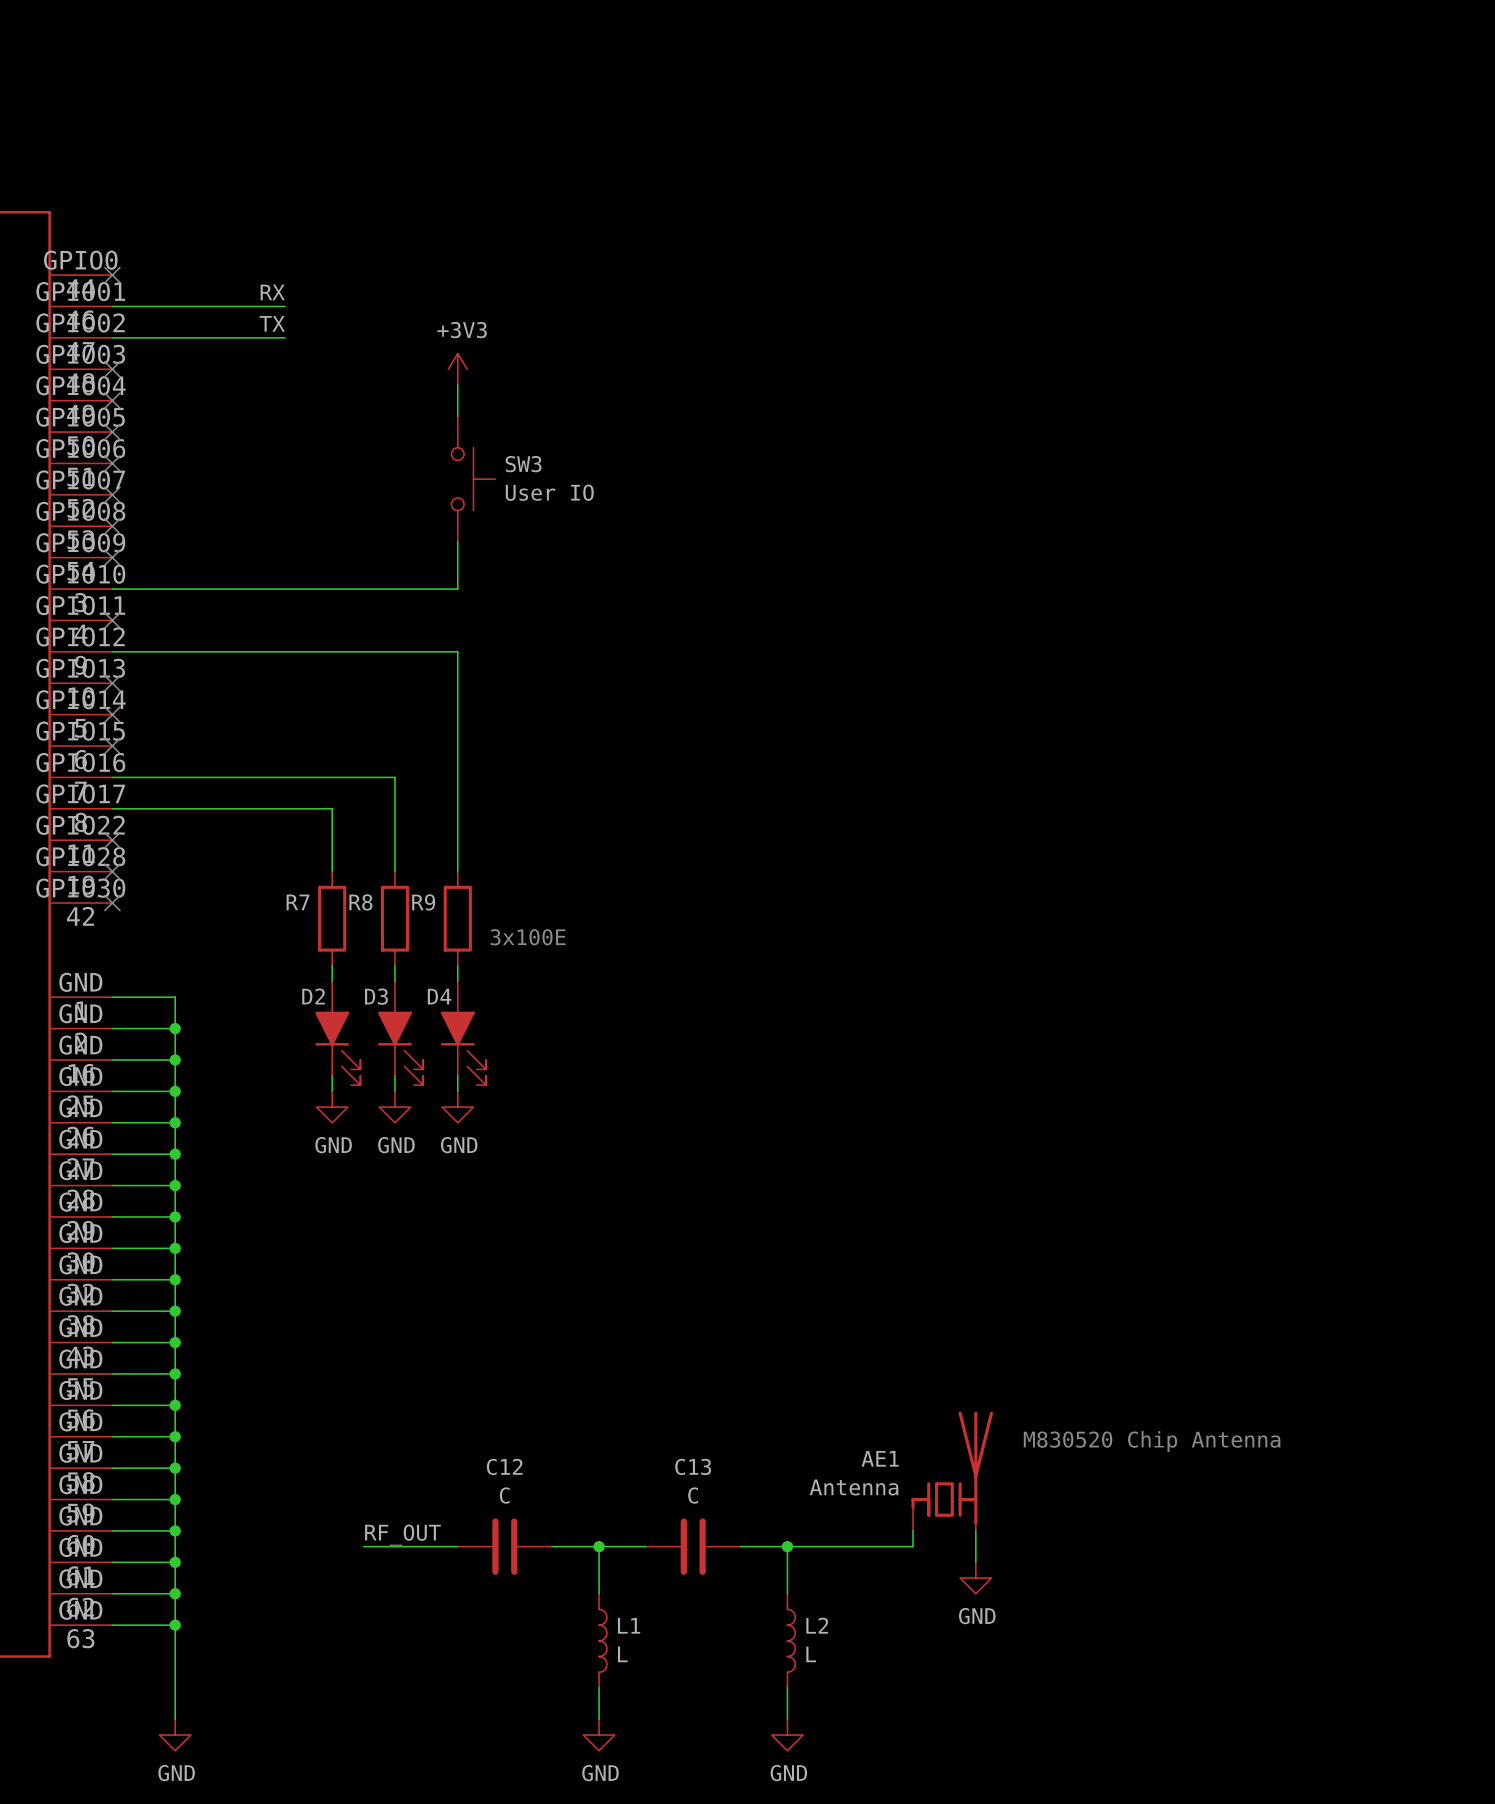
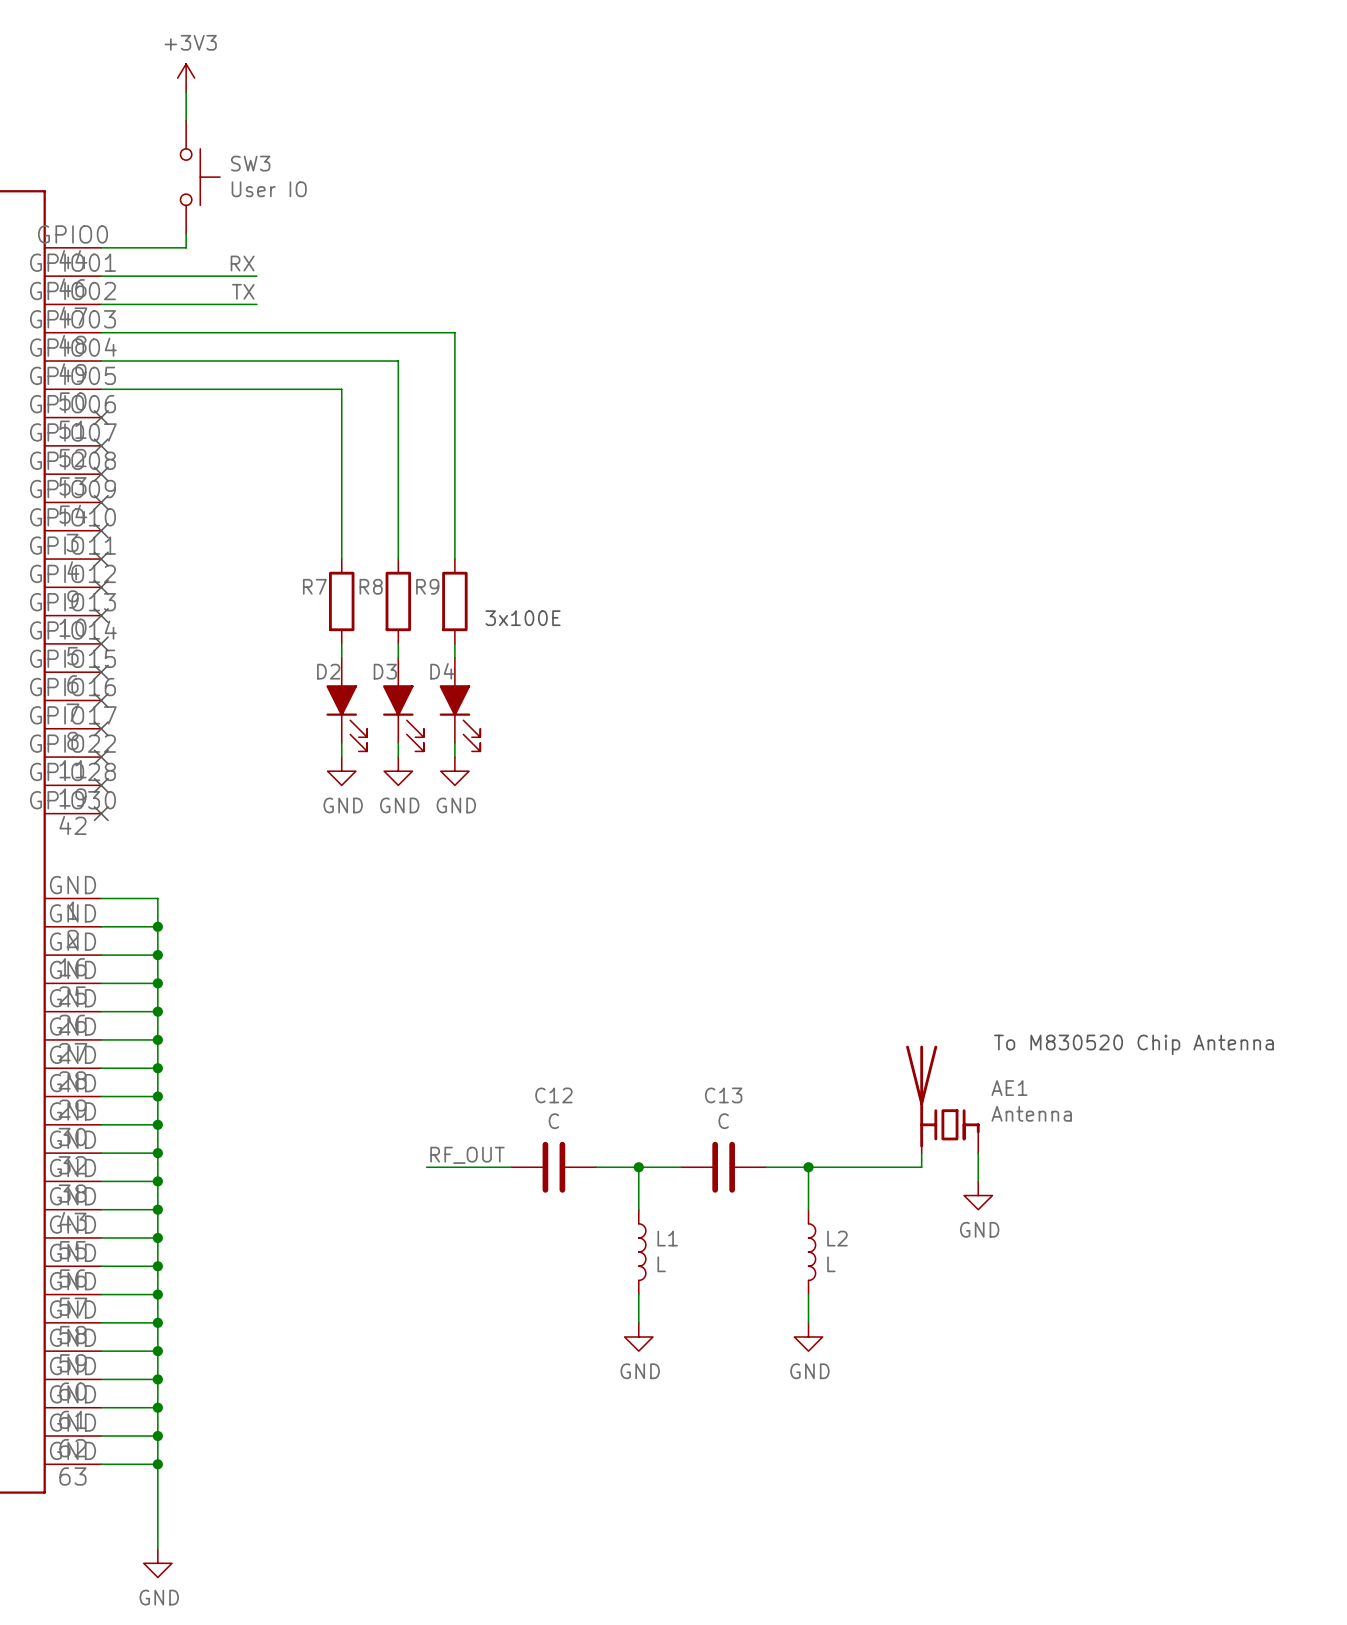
power symbol: none -> +3V3 (186, 78)
wire: none -> (186, 92) (186, 120)
wire: none -> (186, 233) (186, 247) (101, 247)
no-connect mark: (112, 275) -> none
wire: none -> (101, 332) (454, 332) (454, 559)
no-connect mark: (112, 369) -> none
power symbol: +3V3 (457, 369) -> none
wire: (457, 384) (457, 416) -> none
wire: none -> (101, 361) (398, 361) (398, 559)
no-connect mark: (112, 400) -> none
wire: none -> (101, 389) (341, 389) (341, 559)
no-connect mark: (112, 432) -> none
SW3 position: (473, 479) -> (200, 177)
wire: (457, 541) (457, 589) (112, 589) -> none
no-connect mark: none -> (101, 530)
wire: (112, 651) (457, 651) (457, 871) -> none
no-connect mark: none -> (101, 587)
wire: (112, 777) (394, 777) (394, 871) -> none
no-connect mark: none -> (101, 700)
wire: (112, 808) (332, 808) (332, 871) -> none
no-connect mark: none -> (101, 728)
power symbol: none -> GND (341, 771)
power symbol: none -> GND (398, 771)
power symbol: none -> GND (454, 771)
R7 position: (332, 918) -> (341, 601)
R8 position: (394, 918) -> (398, 601)
R9 position: (457, 918) -> (454, 601)
text position: 3x100E (528, 937) -> 3x100E (523, 618)
wire: (332, 965) (332, 981) -> (398, 643) (398, 658)
wire: (394, 965) (394, 981) -> (454, 643) (454, 658)
wire: (457, 965) (457, 981) -> (341, 643) (341, 658)
D2 position: (337, 1033) -> (346, 704)
D3 position: (400, 1033) -> (403, 704)
D4 position: (463, 1033) -> (459, 704)
wire: (332, 1075) (332, 1091) -> (398, 742) (398, 757)
wire: (394, 1075) (394, 1091) -> (454, 742) (454, 757)
wire: (457, 1075) (457, 1091) -> (341, 742) (341, 757)
power symbol: GND (332, 1107) -> none
power symbol: GND (394, 1107) -> none
power symbol: GND (457, 1107) -> none
text: none -> To M830520 Chip Antenna (1133, 1044)
junction: none -> (638, 1167)
junction: none -> (808, 1167)
power symbol: none -> GND (978, 1195)
text: M830520 Chip Antenna (1152, 1441) -> none
AE1 flip: as is (952, 1468) -> left-right (942, 1096)
AE1 position: (952, 1471) -> (942, 1099)
power symbol: none -> GND (638, 1337)
wire: (913, 1530) (913, 1546) (740, 1546) -> (921, 1153) (921, 1167) (766, 1167)
wire: (975, 1530) (975, 1562) -> (978, 1153) (978, 1181)
label position: RF_OUT (402, 1535) -> RF_OUT (467, 1155)
wire: (363, 1546) (457, 1546) -> (426, 1167) (511, 1167)
C12 position: (504, 1546) -> (553, 1167)
wire: (551, 1546) (646, 1546) -> (596, 1167) (681, 1167)
wire: (599, 1546) (599, 1593) -> (638, 1167) (638, 1209)
junction: (599, 1546) -> none
C13 position: (693, 1546) -> (723, 1167)
wire: (787, 1546) (787, 1593) -> (808, 1167) (808, 1209)
junction: (787, 1546) -> none
power symbol position: GND (975, 1578) -> GND (808, 1337)
L1 position: (602, 1640) -> (642, 1252)
L2 position: (791, 1640) -> (812, 1252)
wire: (599, 1687) (599, 1719) -> (638, 1294) (638, 1322)
wire: (787, 1687) (787, 1719) -> (808, 1294) (808, 1322)
power symbol: GND (599, 1735) -> none
power symbol: GND (787, 1735) -> none

